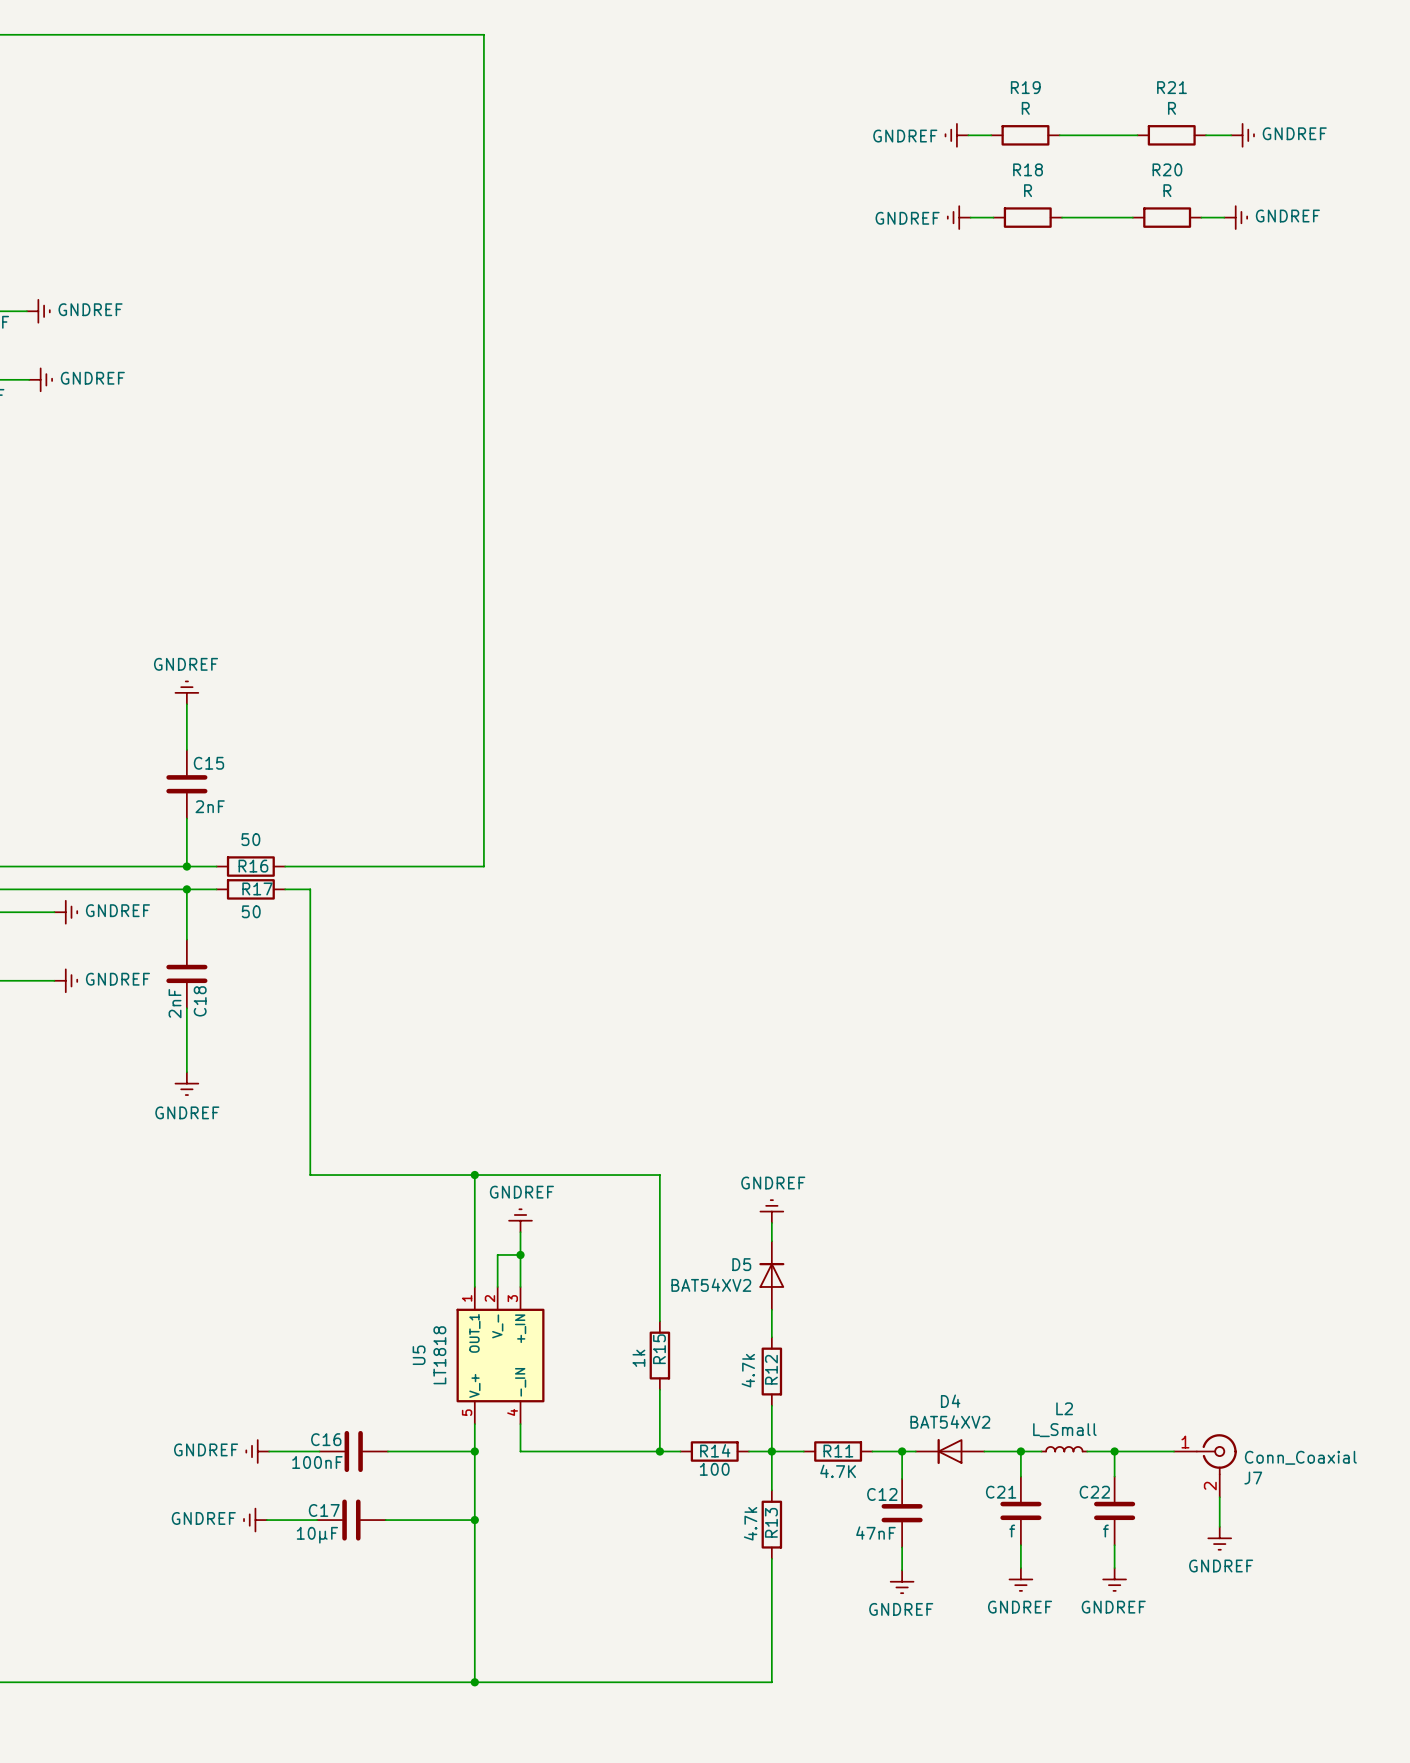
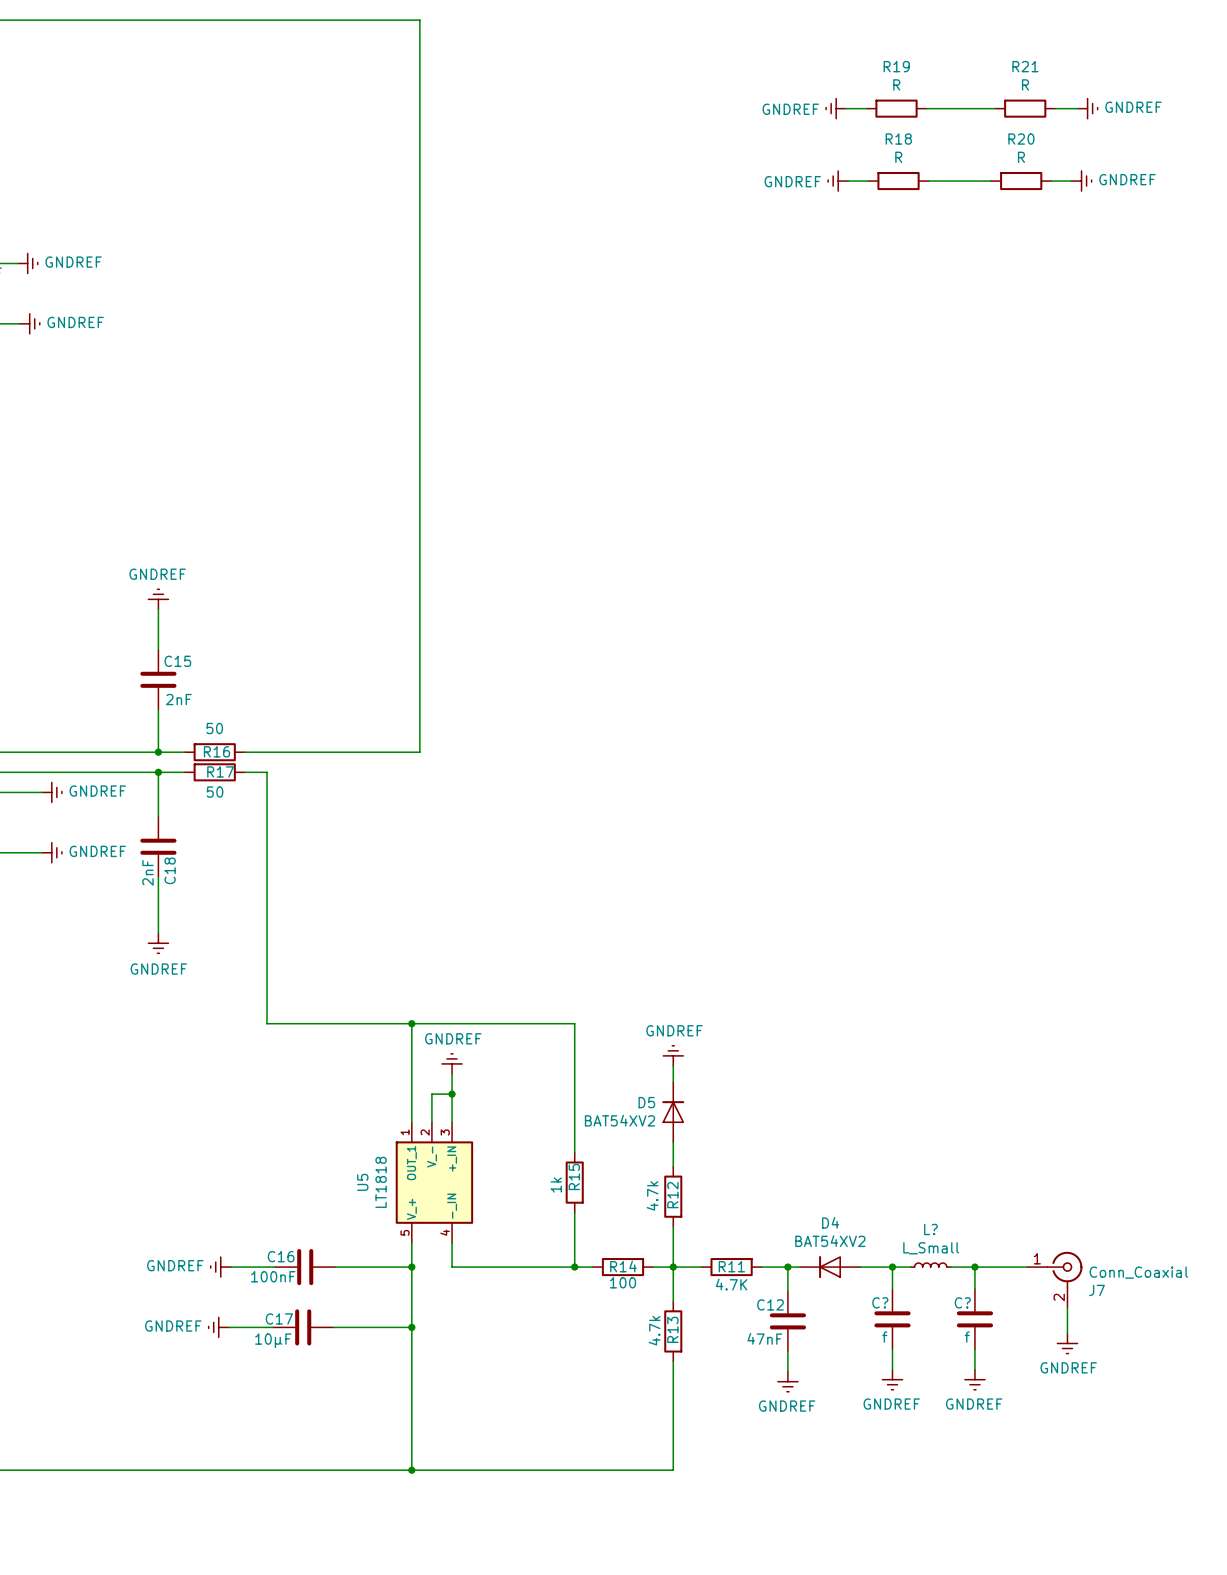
L2 name: L2 (1064, 1408) -> L? (930, 1229)
C21 name: C21 (1001, 1492) -> C? (880, 1302)
C22 name: C22 (1094, 1492) -> C? (962, 1302)

